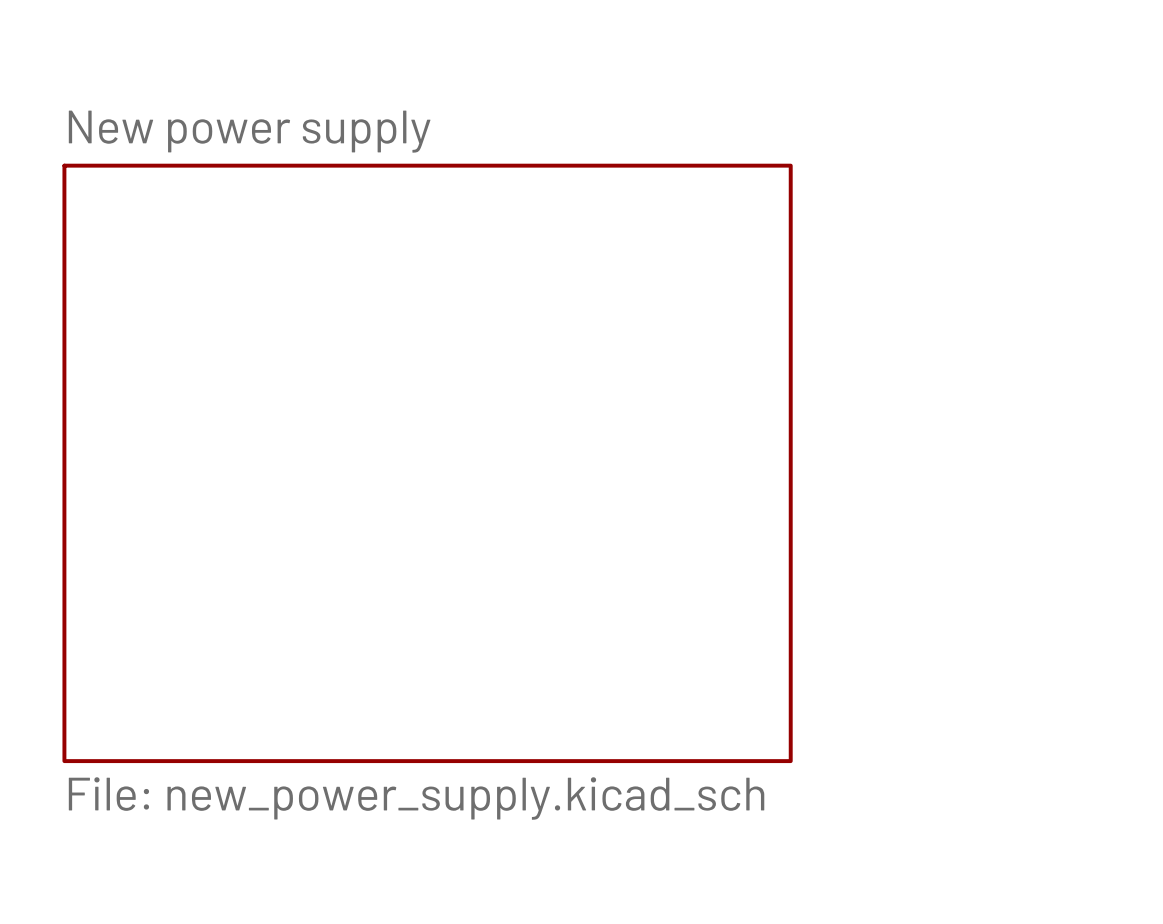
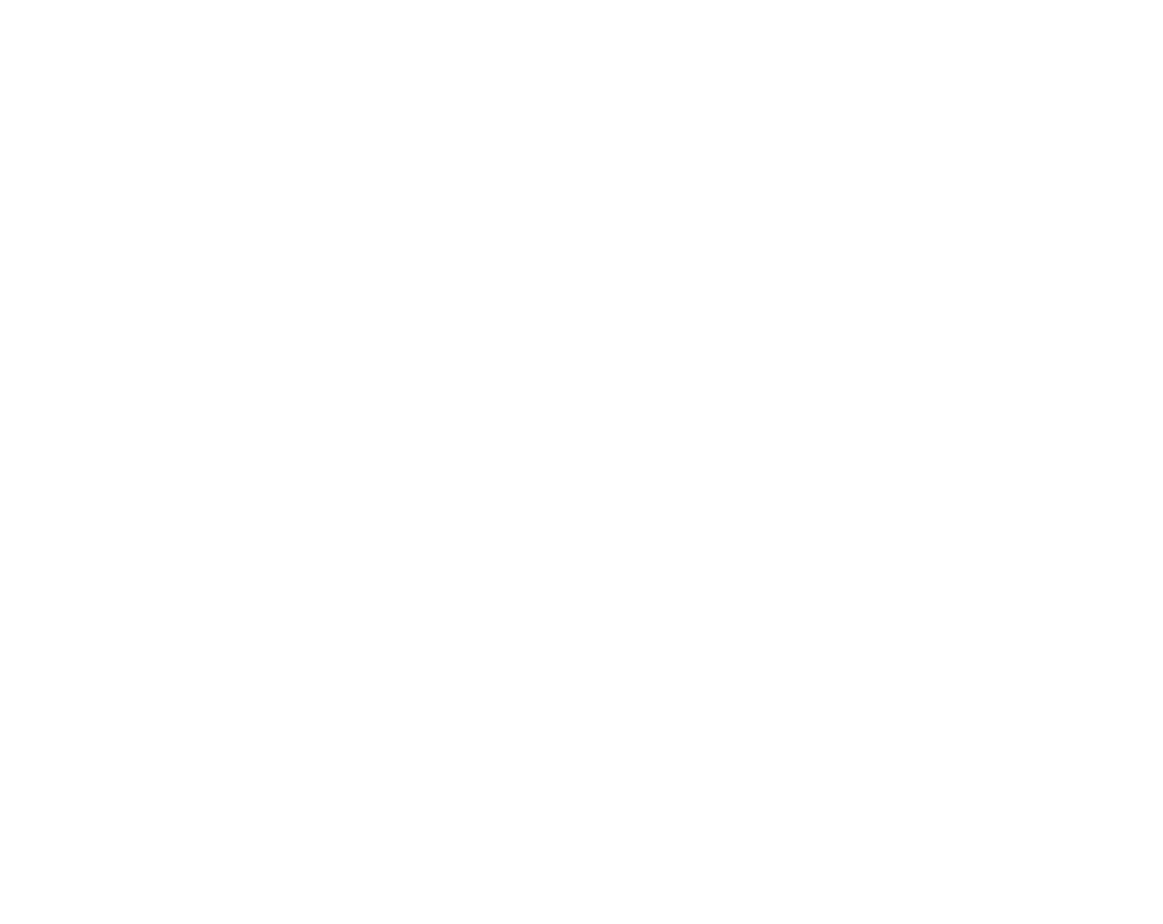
sheet New power supply: File: new_power_supply.kicad_sch (427, 463) -> none

